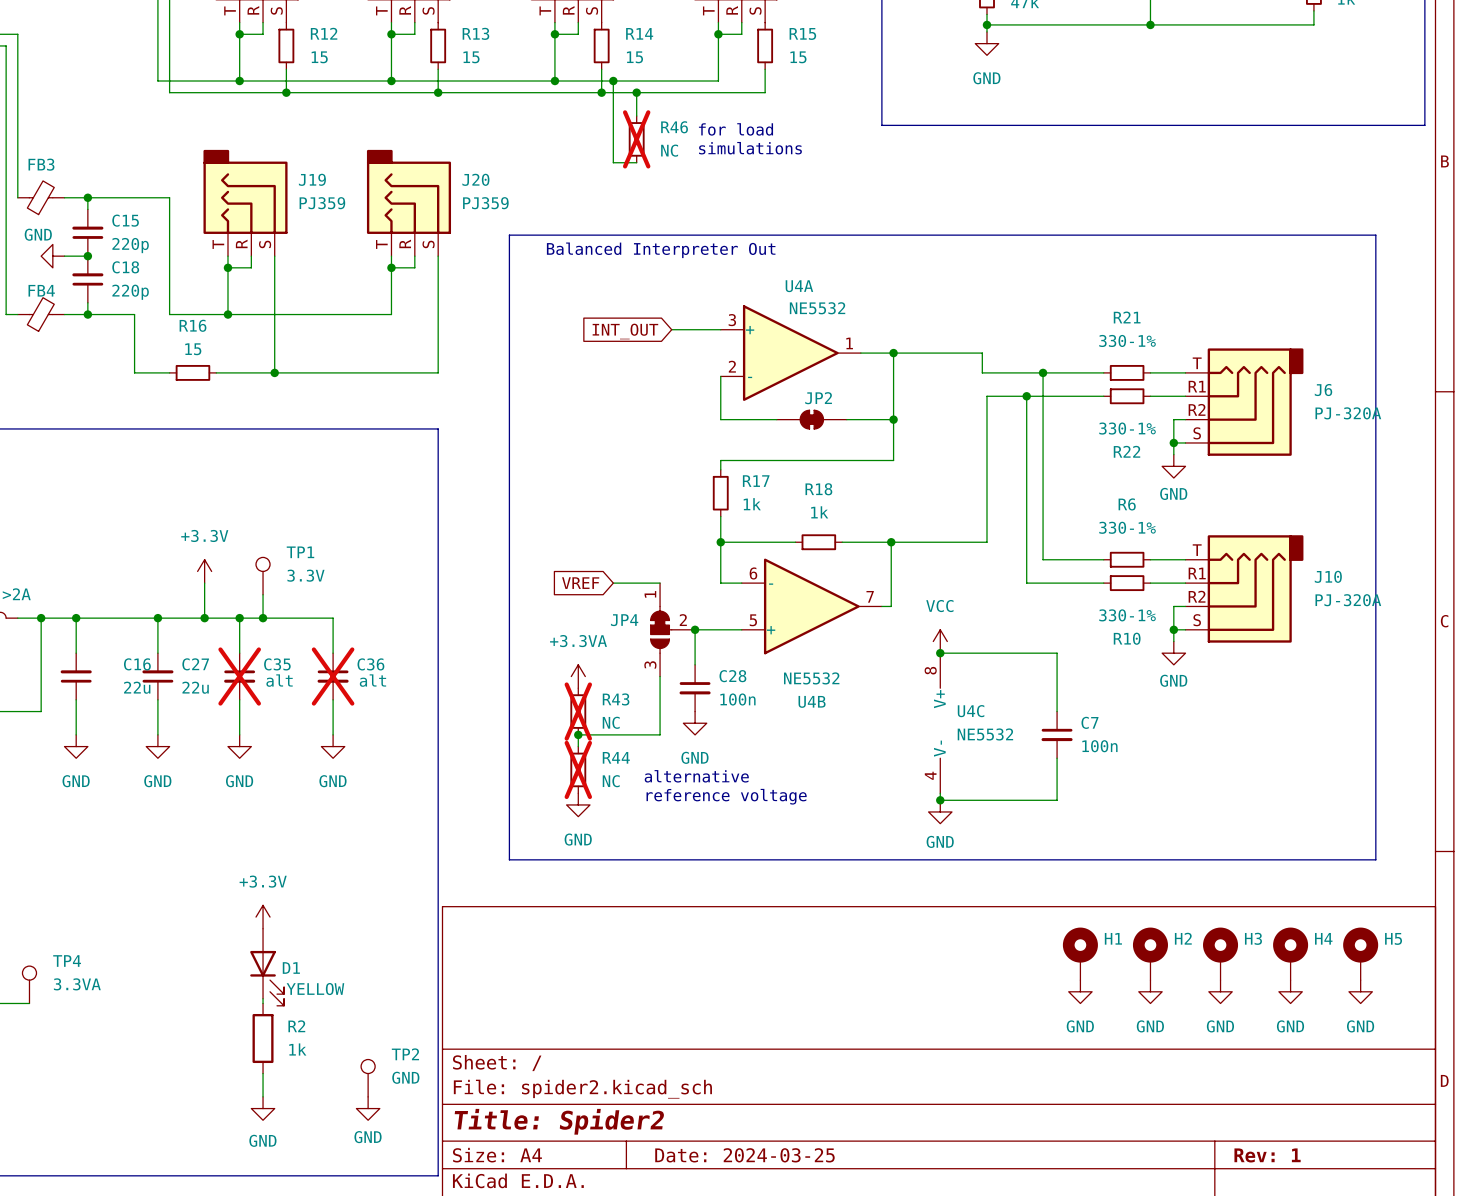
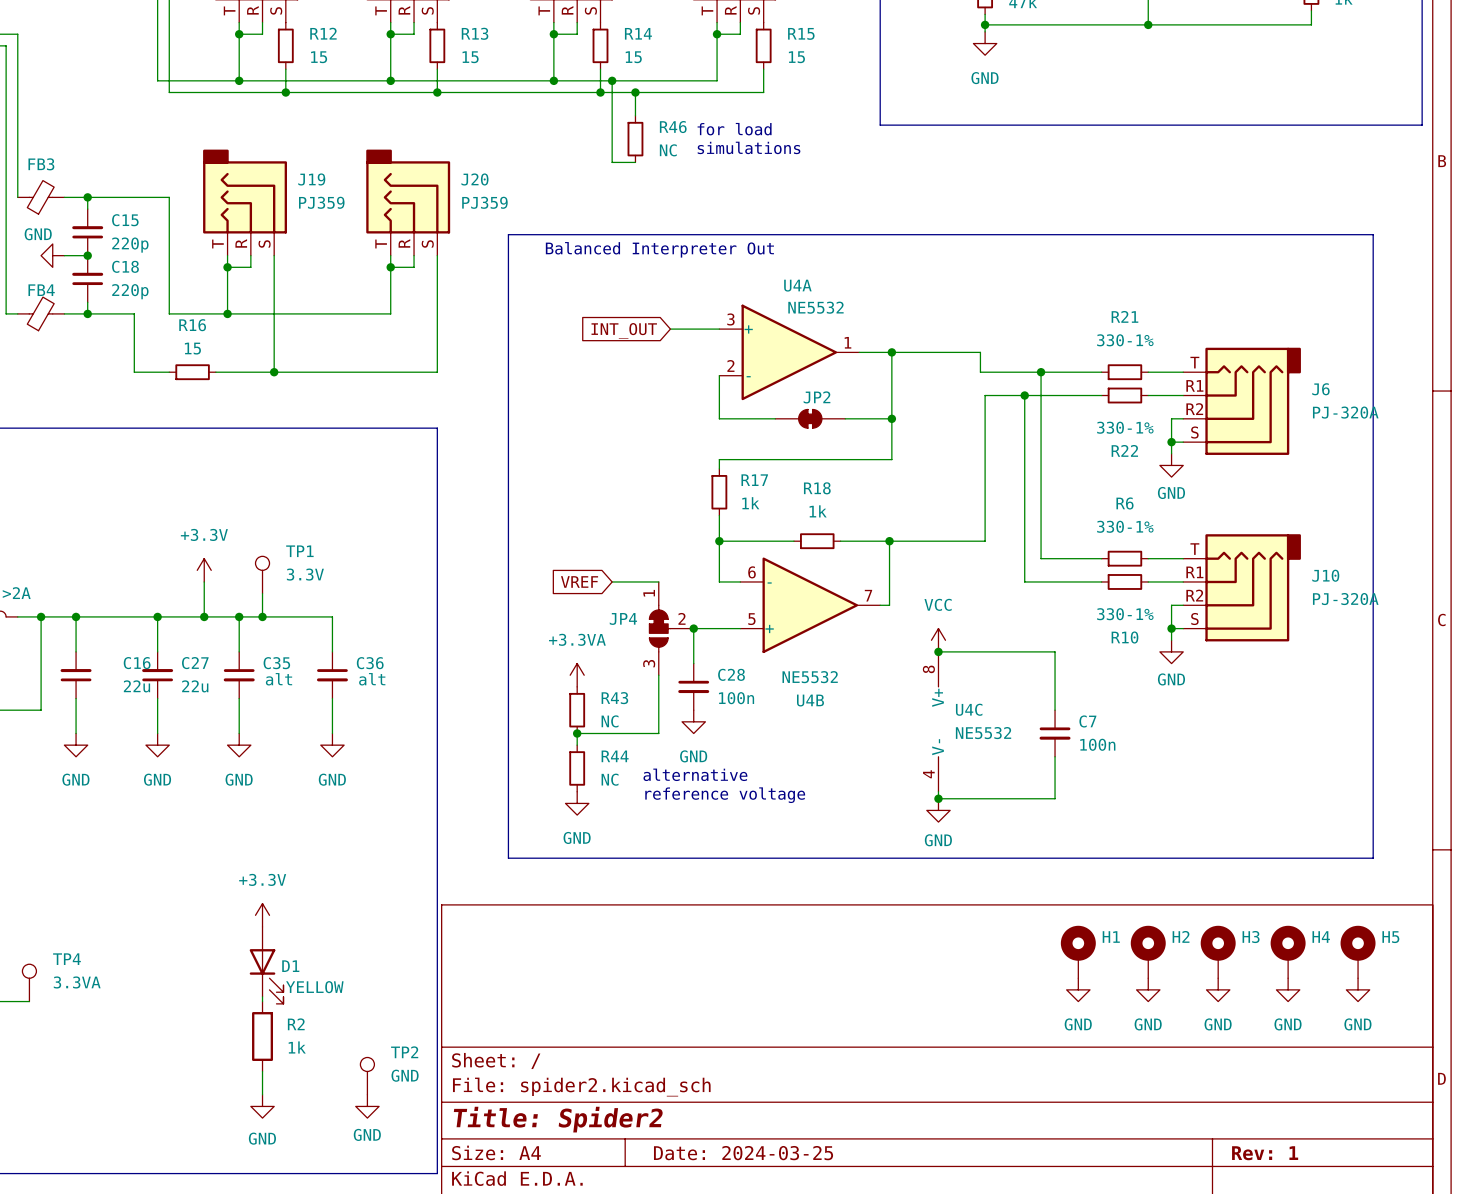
R46 do-not-place cross: (636, 139) -> none
C35 do-not-place cross: (239, 676) -> none
C36 do-not-place cross: (333, 676) -> none
R43 do-not-place cross: (578, 711) -> none
R44 do-not-place cross: (578, 769) -> none

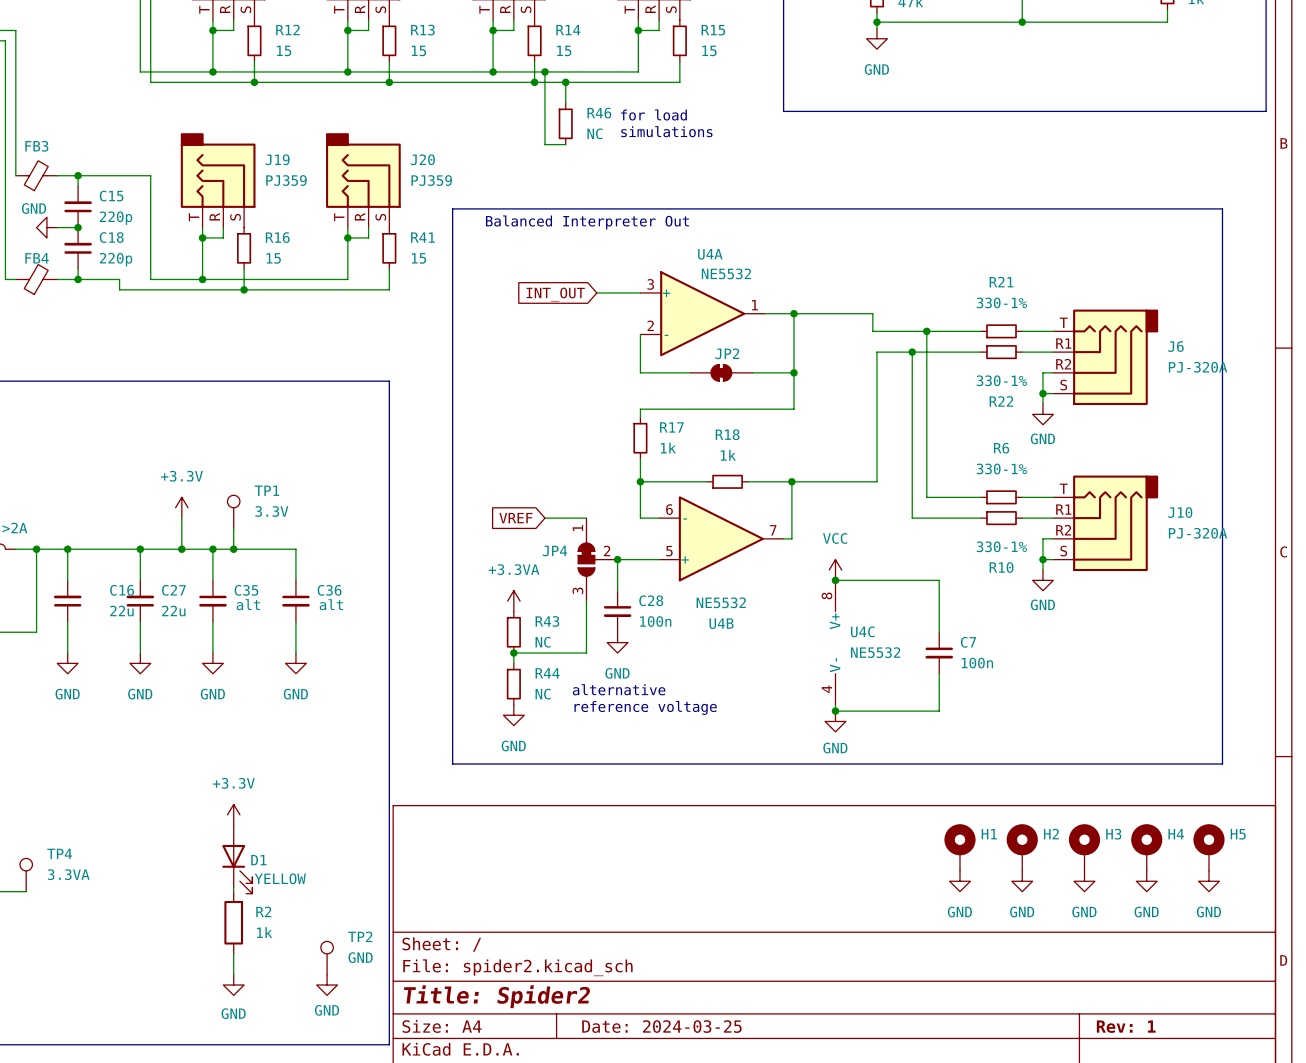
wire: (274, 255) (274, 302) -> none
wire: (437, 255) (437, 302) -> none
R41: none -> 15 (389, 248)
wire: (134, 325) (134, 372) (169, 372) -> none
wire: (274, 325) (274, 372) -> none
wire: (437, 325) (437, 372) (215, 372) -> (389, 289) (119, 289)
R16 value position: 15 (192, 348) -> 15 (273, 258)
R16 rotation: 0° (192, 372) -> 90° clockwise (244, 248)
R16 position: (192, 372) -> (244, 248)
junction position: (274, 372) -> (244, 289)

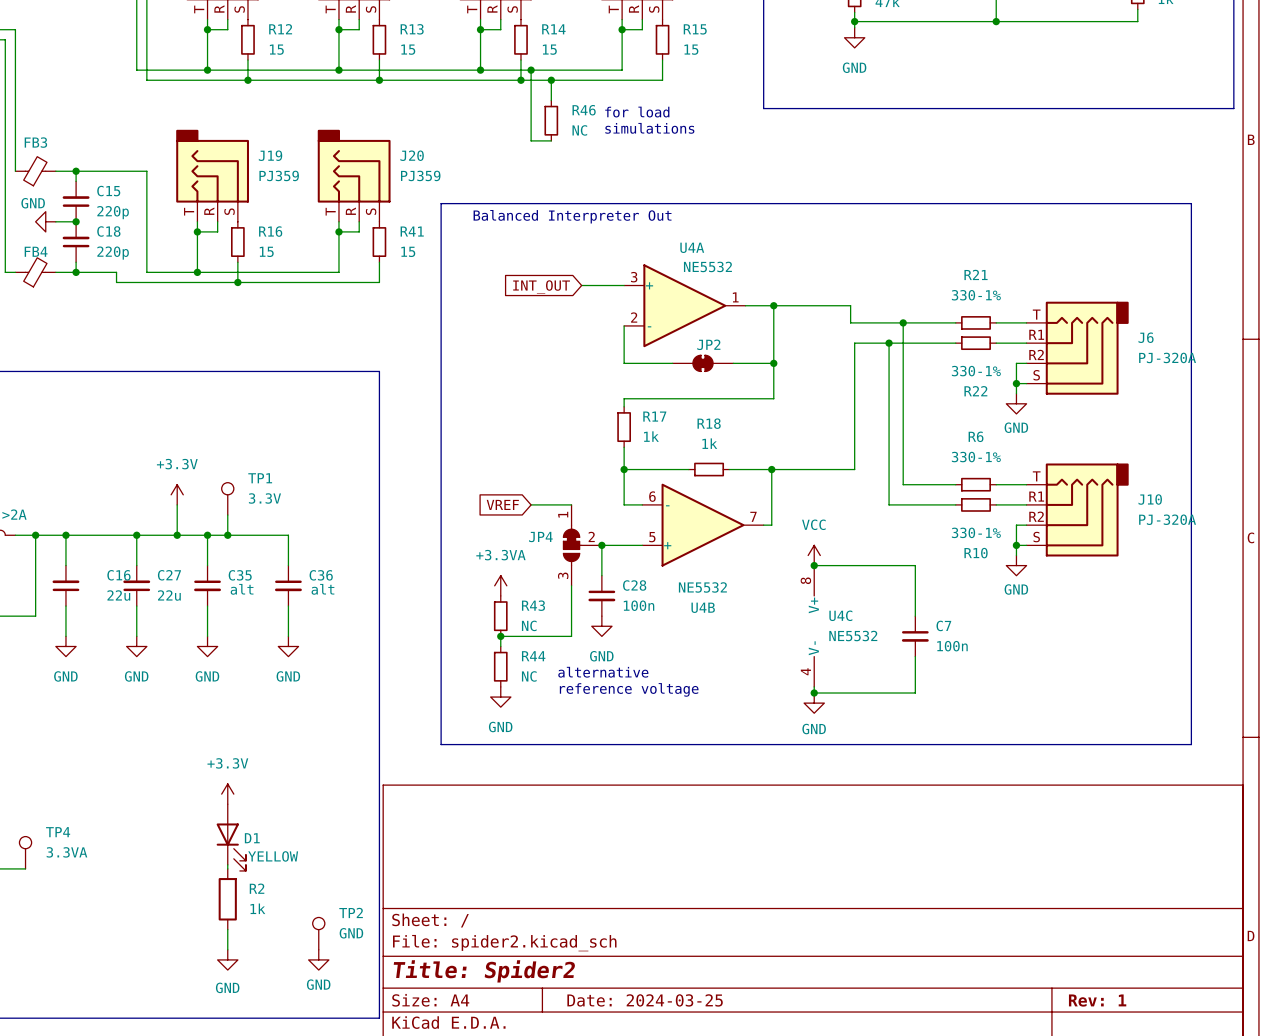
H1: (959, 847) -> none
H2: (1022, 847) -> none
H3: (1084, 847) -> none
H4: (1146, 847) -> none
H5: (1209, 847) -> none
power symbol: GND (959, 881) -> none
power symbol: GND (1022, 881) -> none
power symbol: GND (1084, 881) -> none
power symbol: GND (1146, 881) -> none
power symbol: GND (1209, 881) -> none

